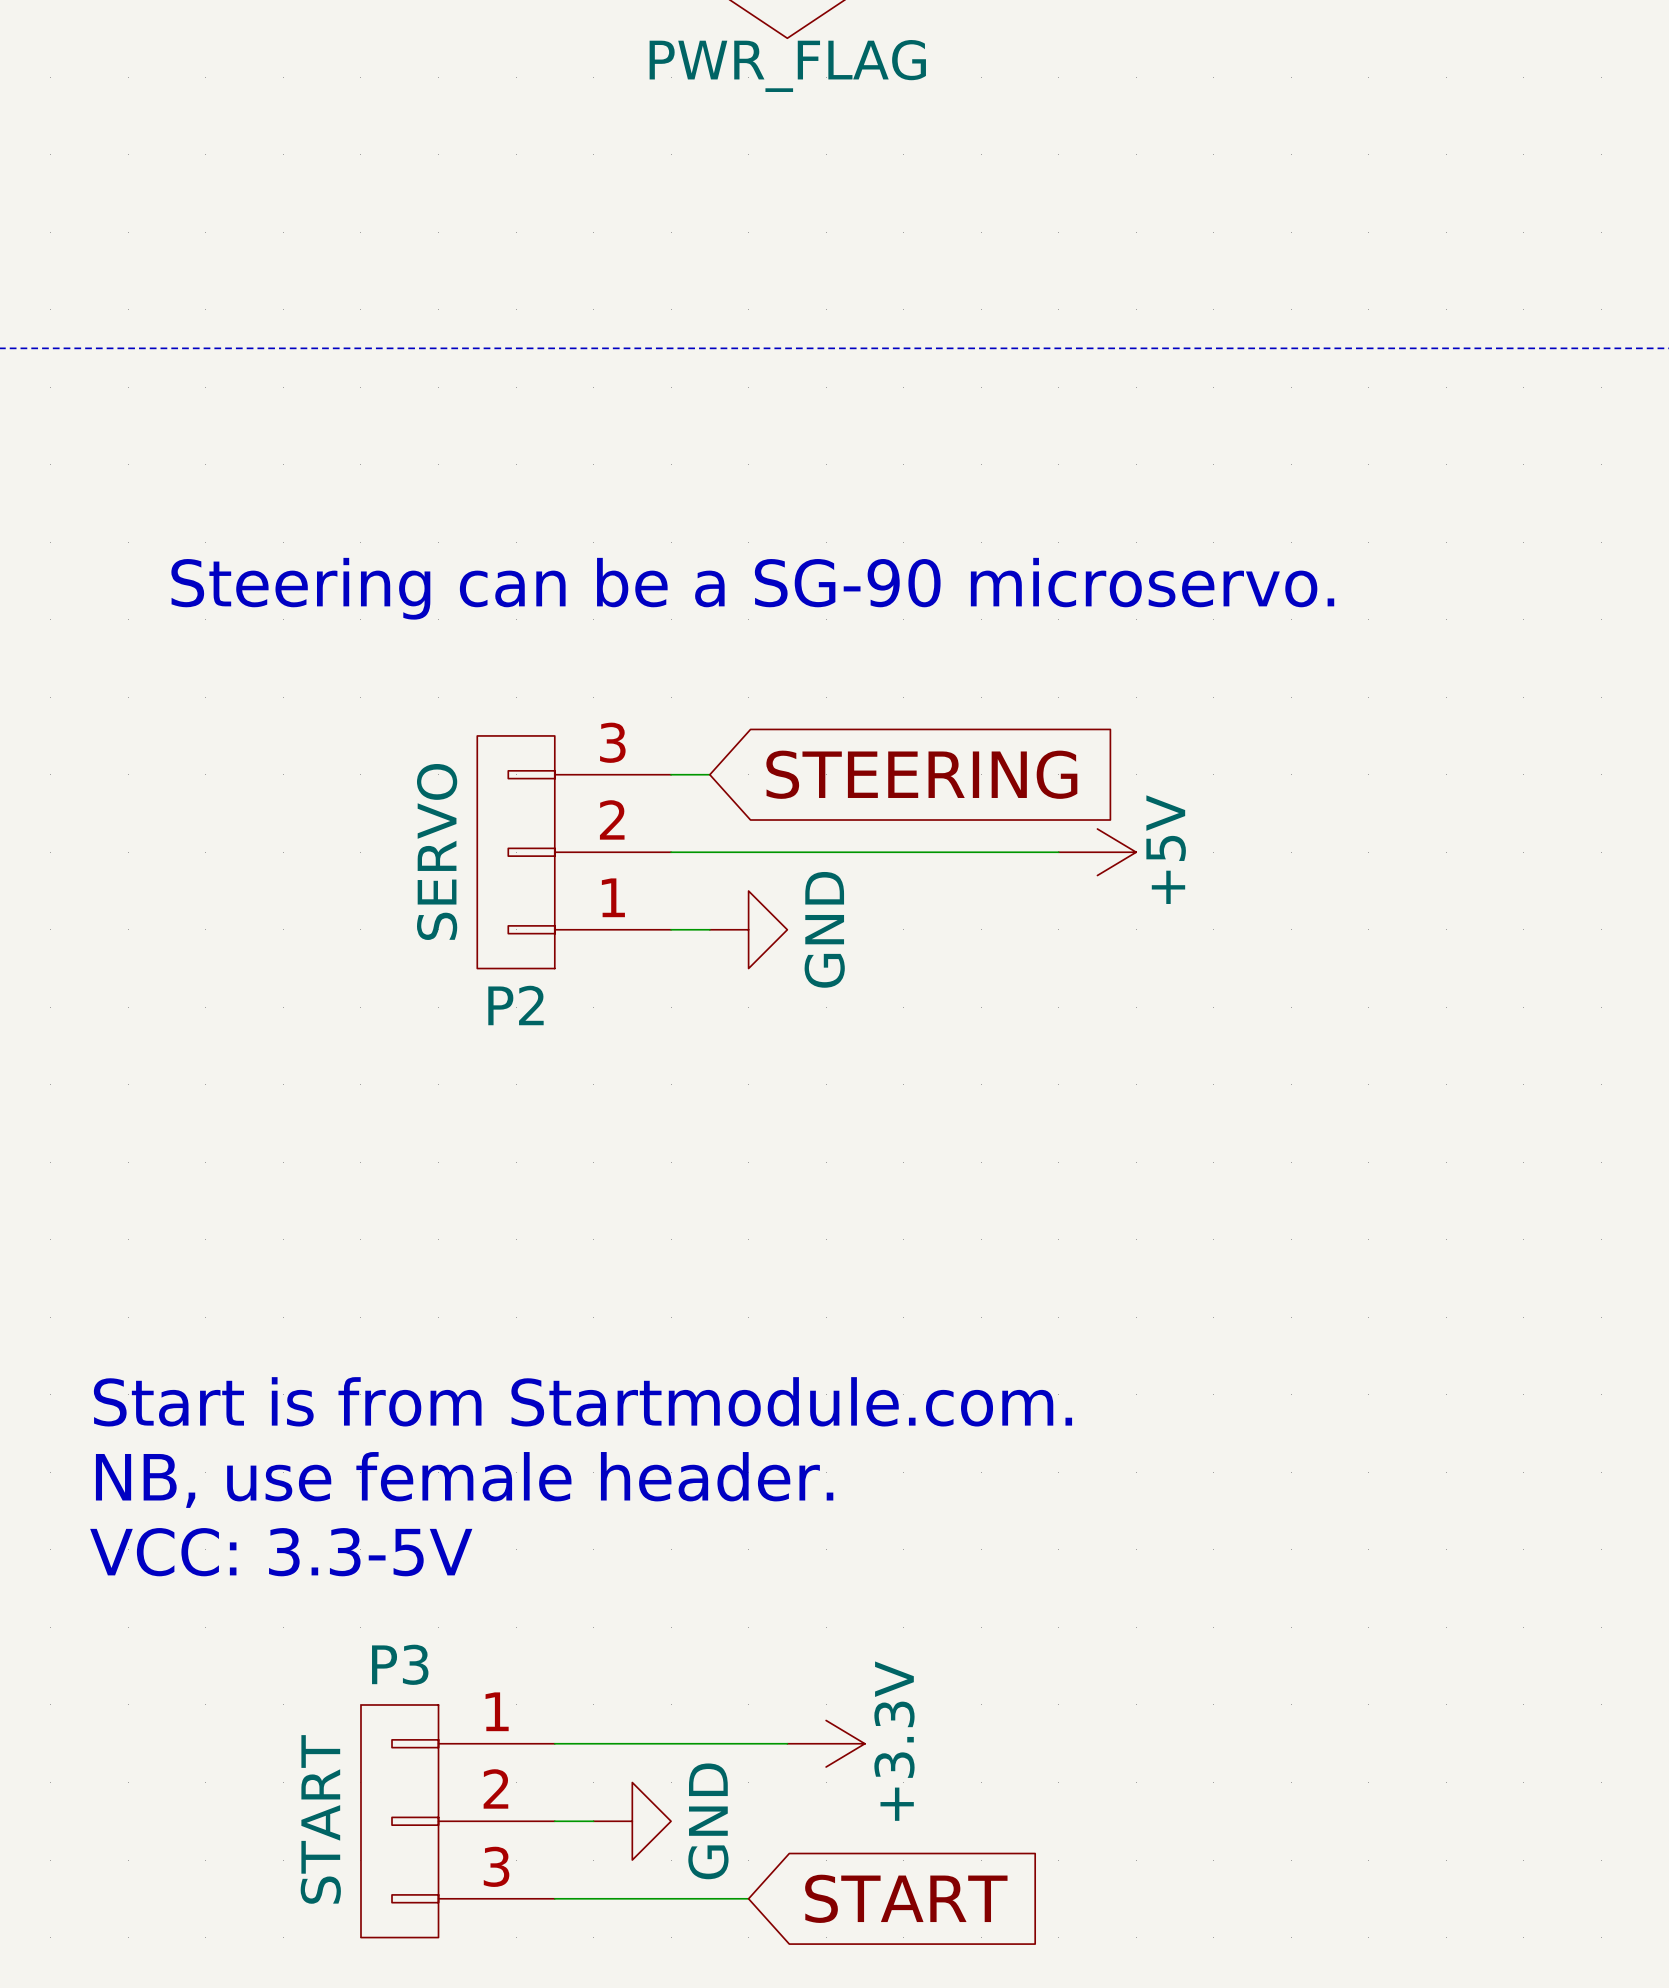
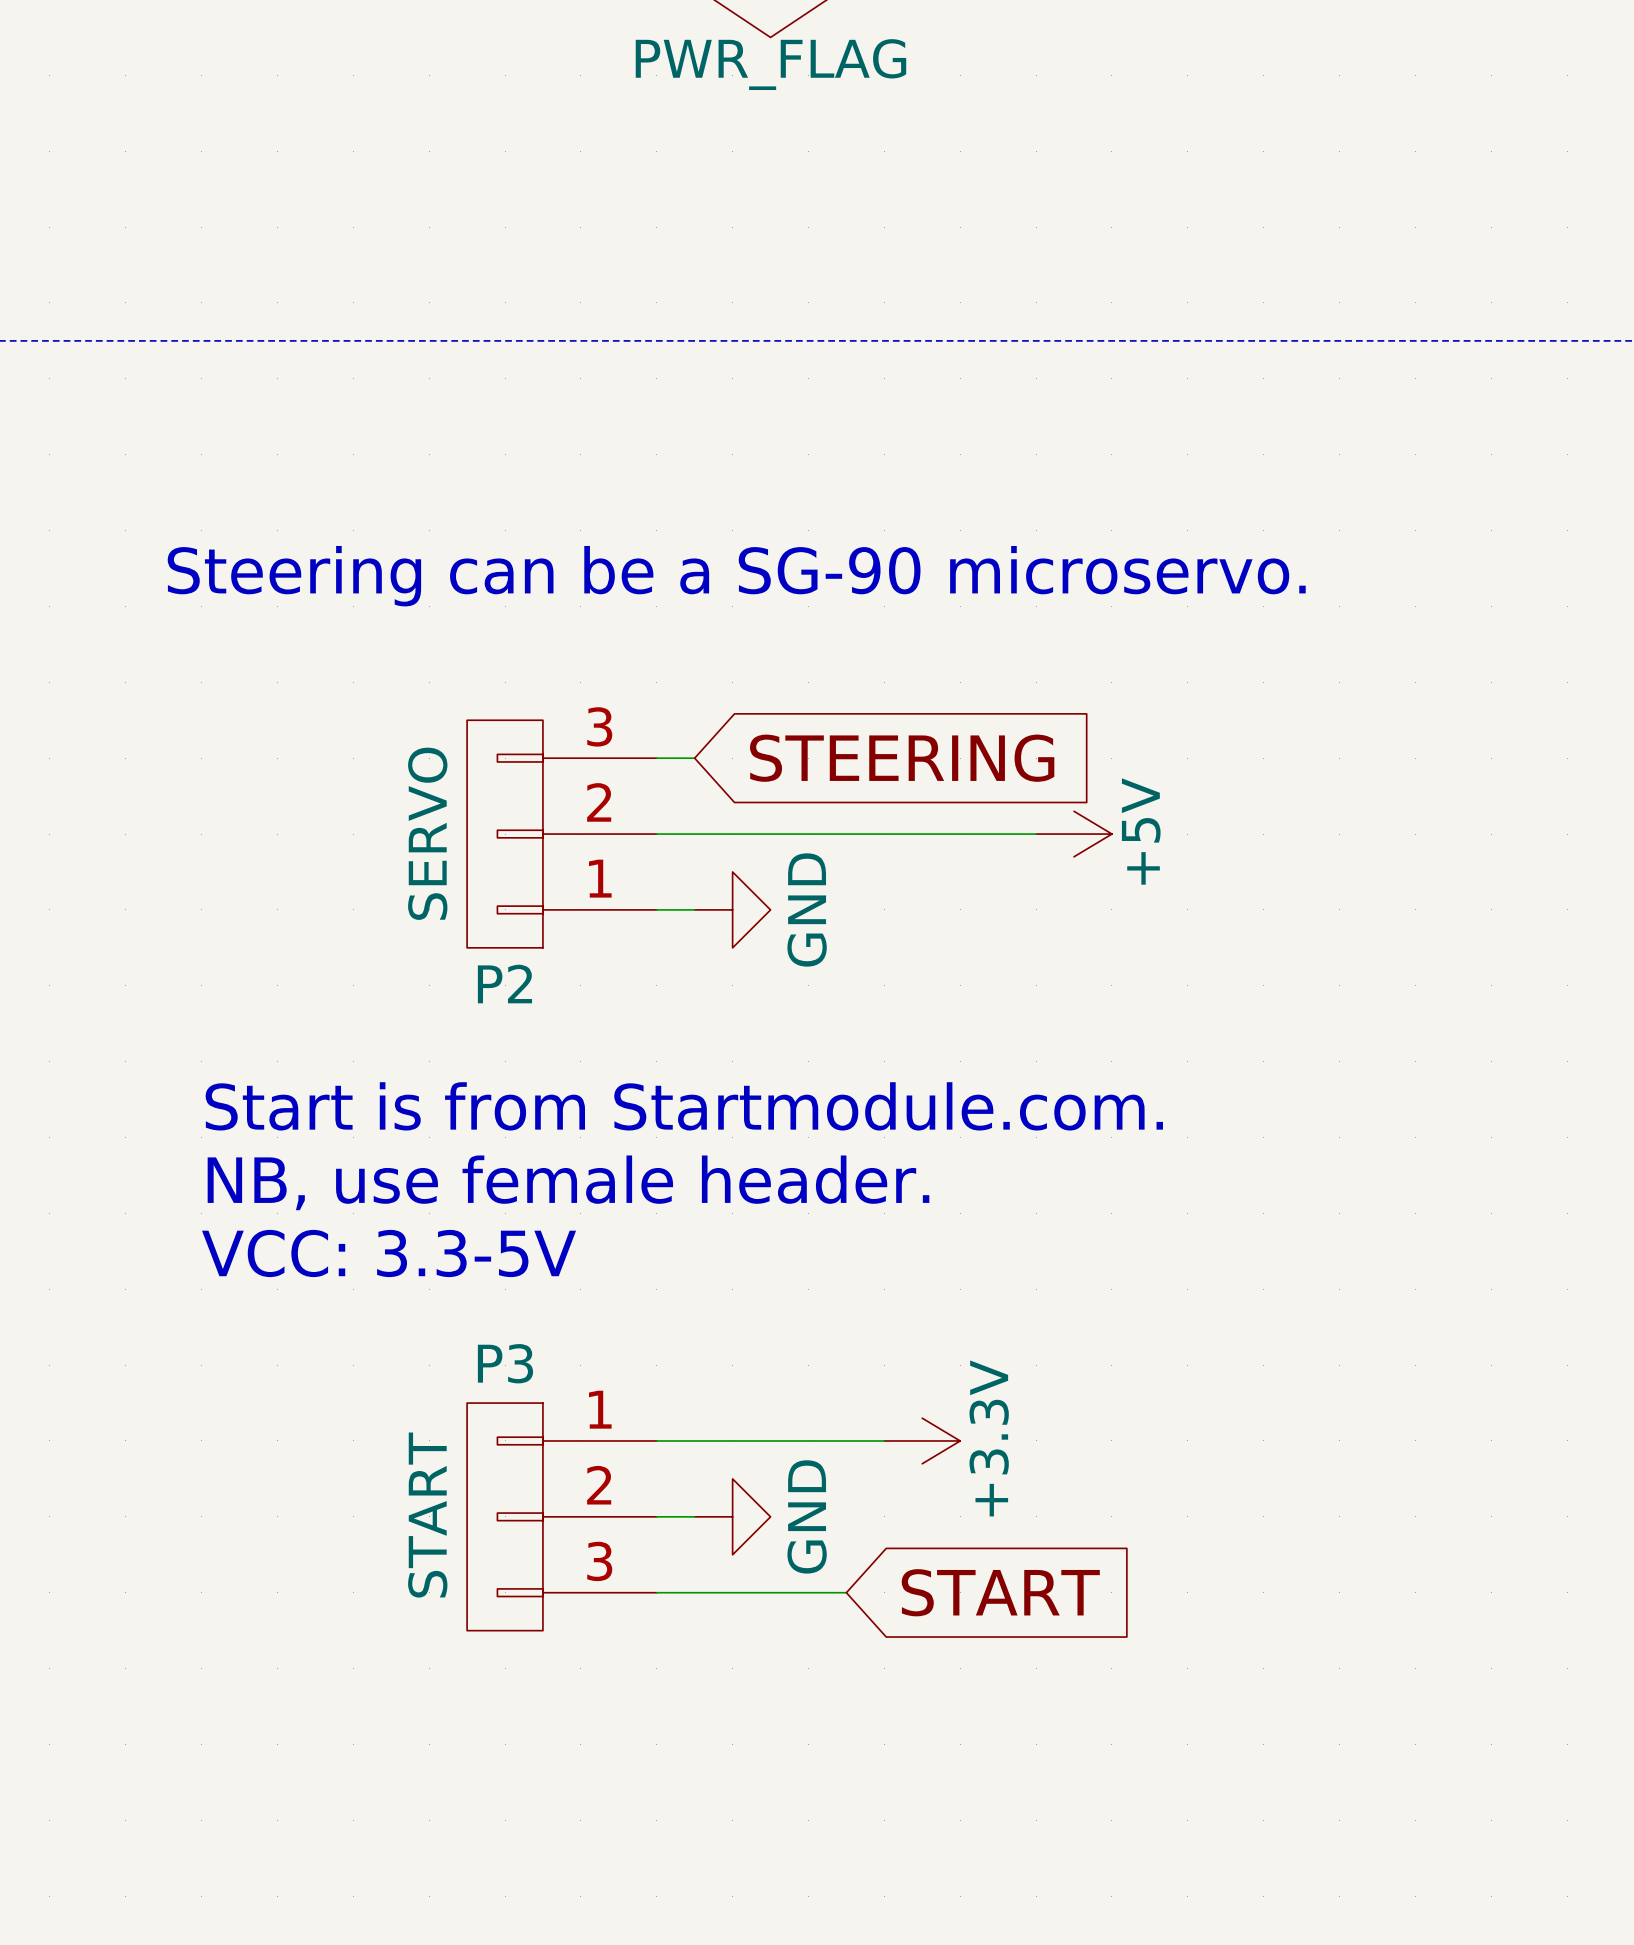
text position: Start is from Startmodule.com. (582, 1401) -> Start is from Startmodule.com. (684, 1106)
text position: NB, use female header. (464, 1479) -> NB, use female header. (568, 1182)
text position: VCC: 3.3-5V (281, 1552) -> VCC: 3.3-5V (389, 1253)
wire: (554, 1743) (787, 1743) -> (656, 1440) (884, 1440)
power symbol position: +3.3V (826, 1743) -> +3.3V (922, 1440)
P3 position: (457, 1821) -> (561, 1516)
wire: (554, 1821) (593, 1821) -> (656, 1516) (694, 1516)
power symbol position: GND (632, 1821) -> GND (732, 1516)
wire: (554, 1898) (748, 1898) -> (656, 1592) (846, 1592)
global label position: START (906, 1898) -> START (1000, 1592)

